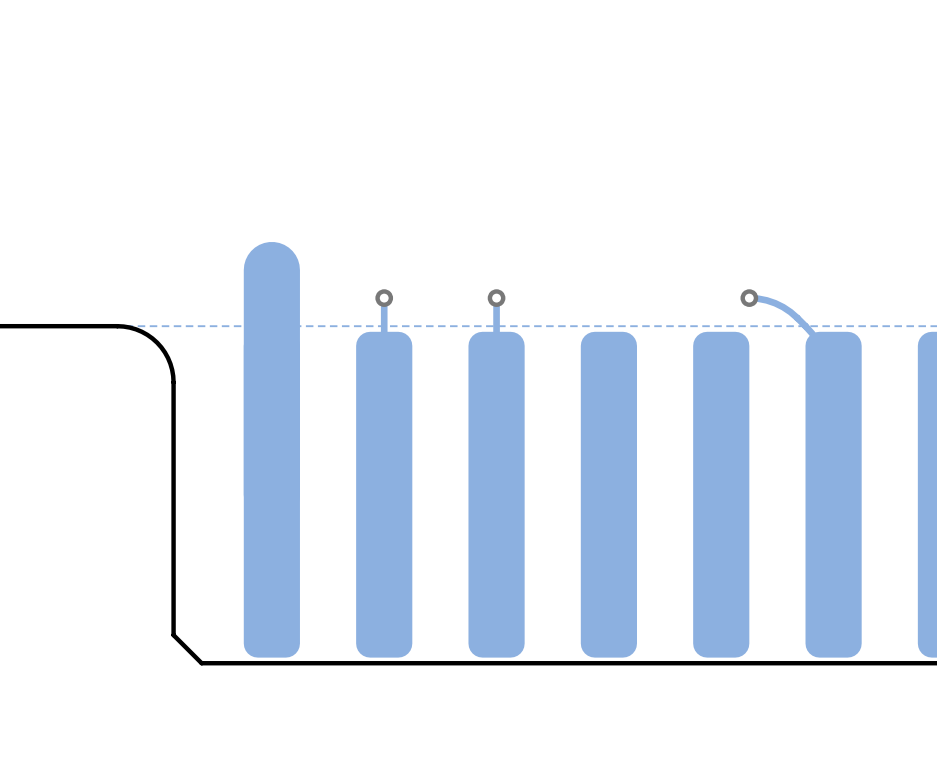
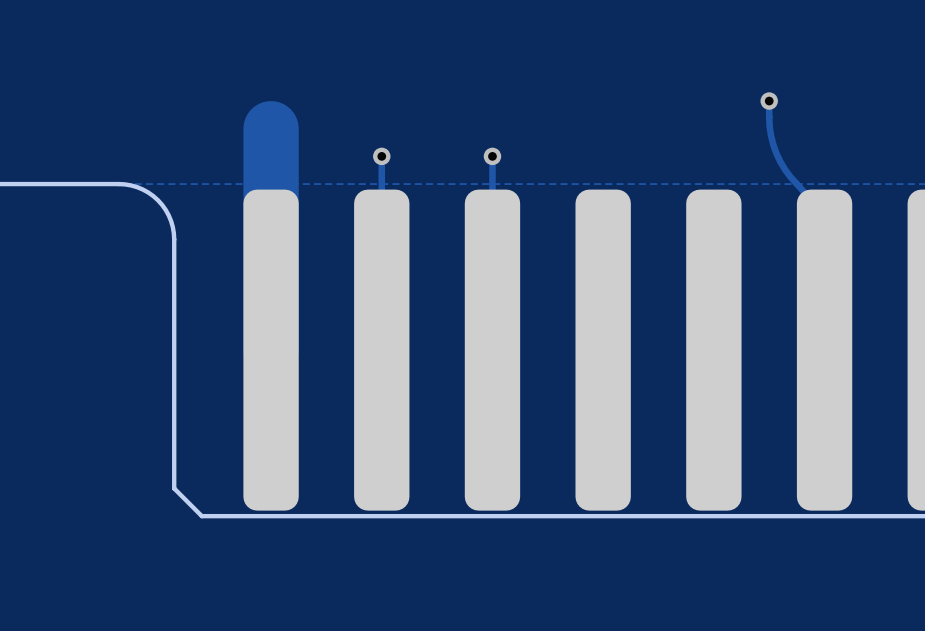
track: (749, 298) (766, 300) (783, 307) (805, 326) -> (769, 101) (769, 126) (773, 144) (785, 169) (796, 184)
via position: (749, 298) -> (769, 101)

